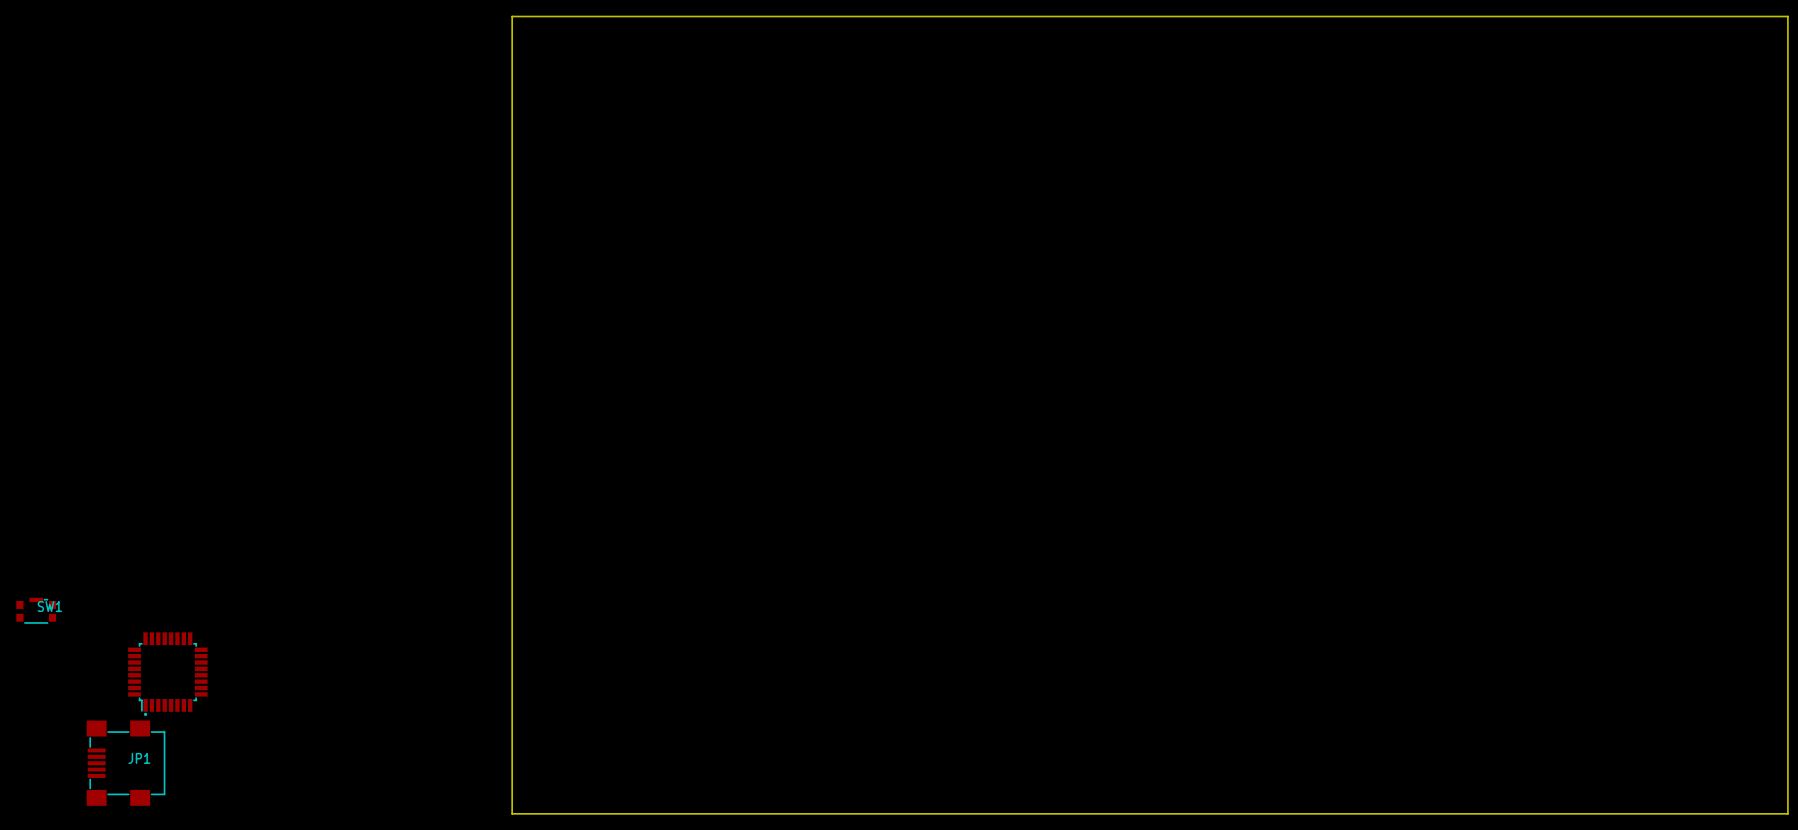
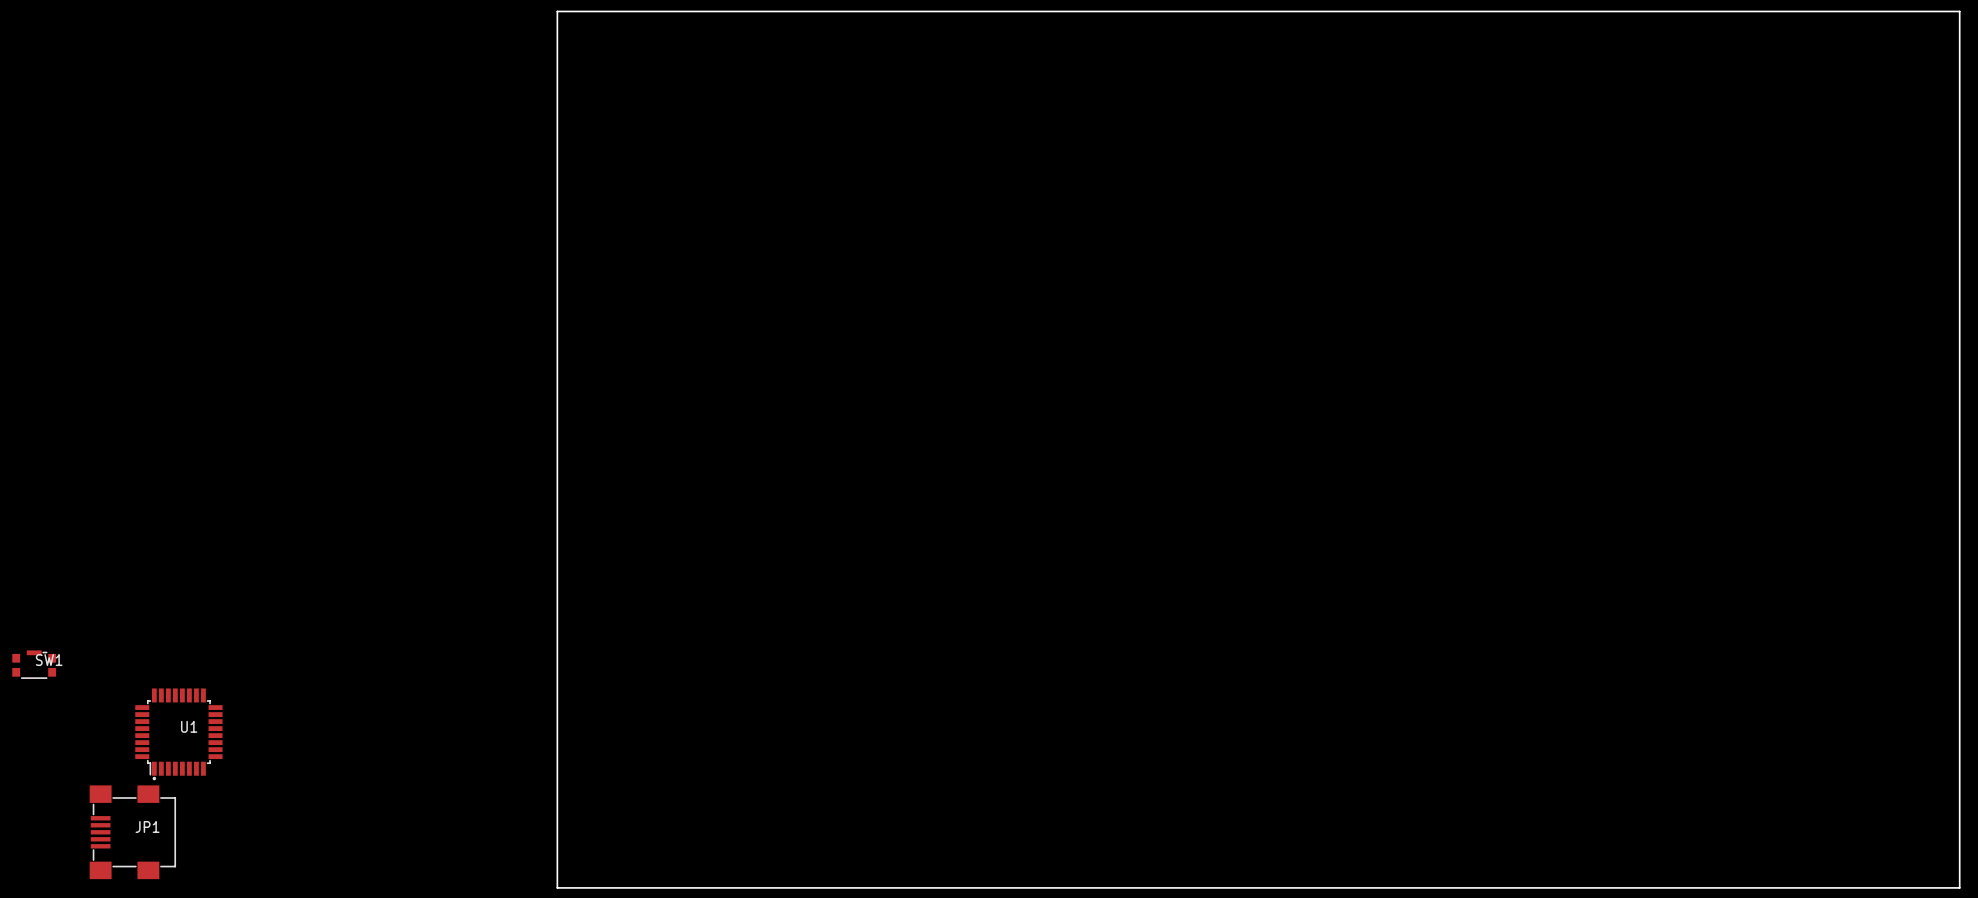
U1 name: none -> U1 (189, 726)

